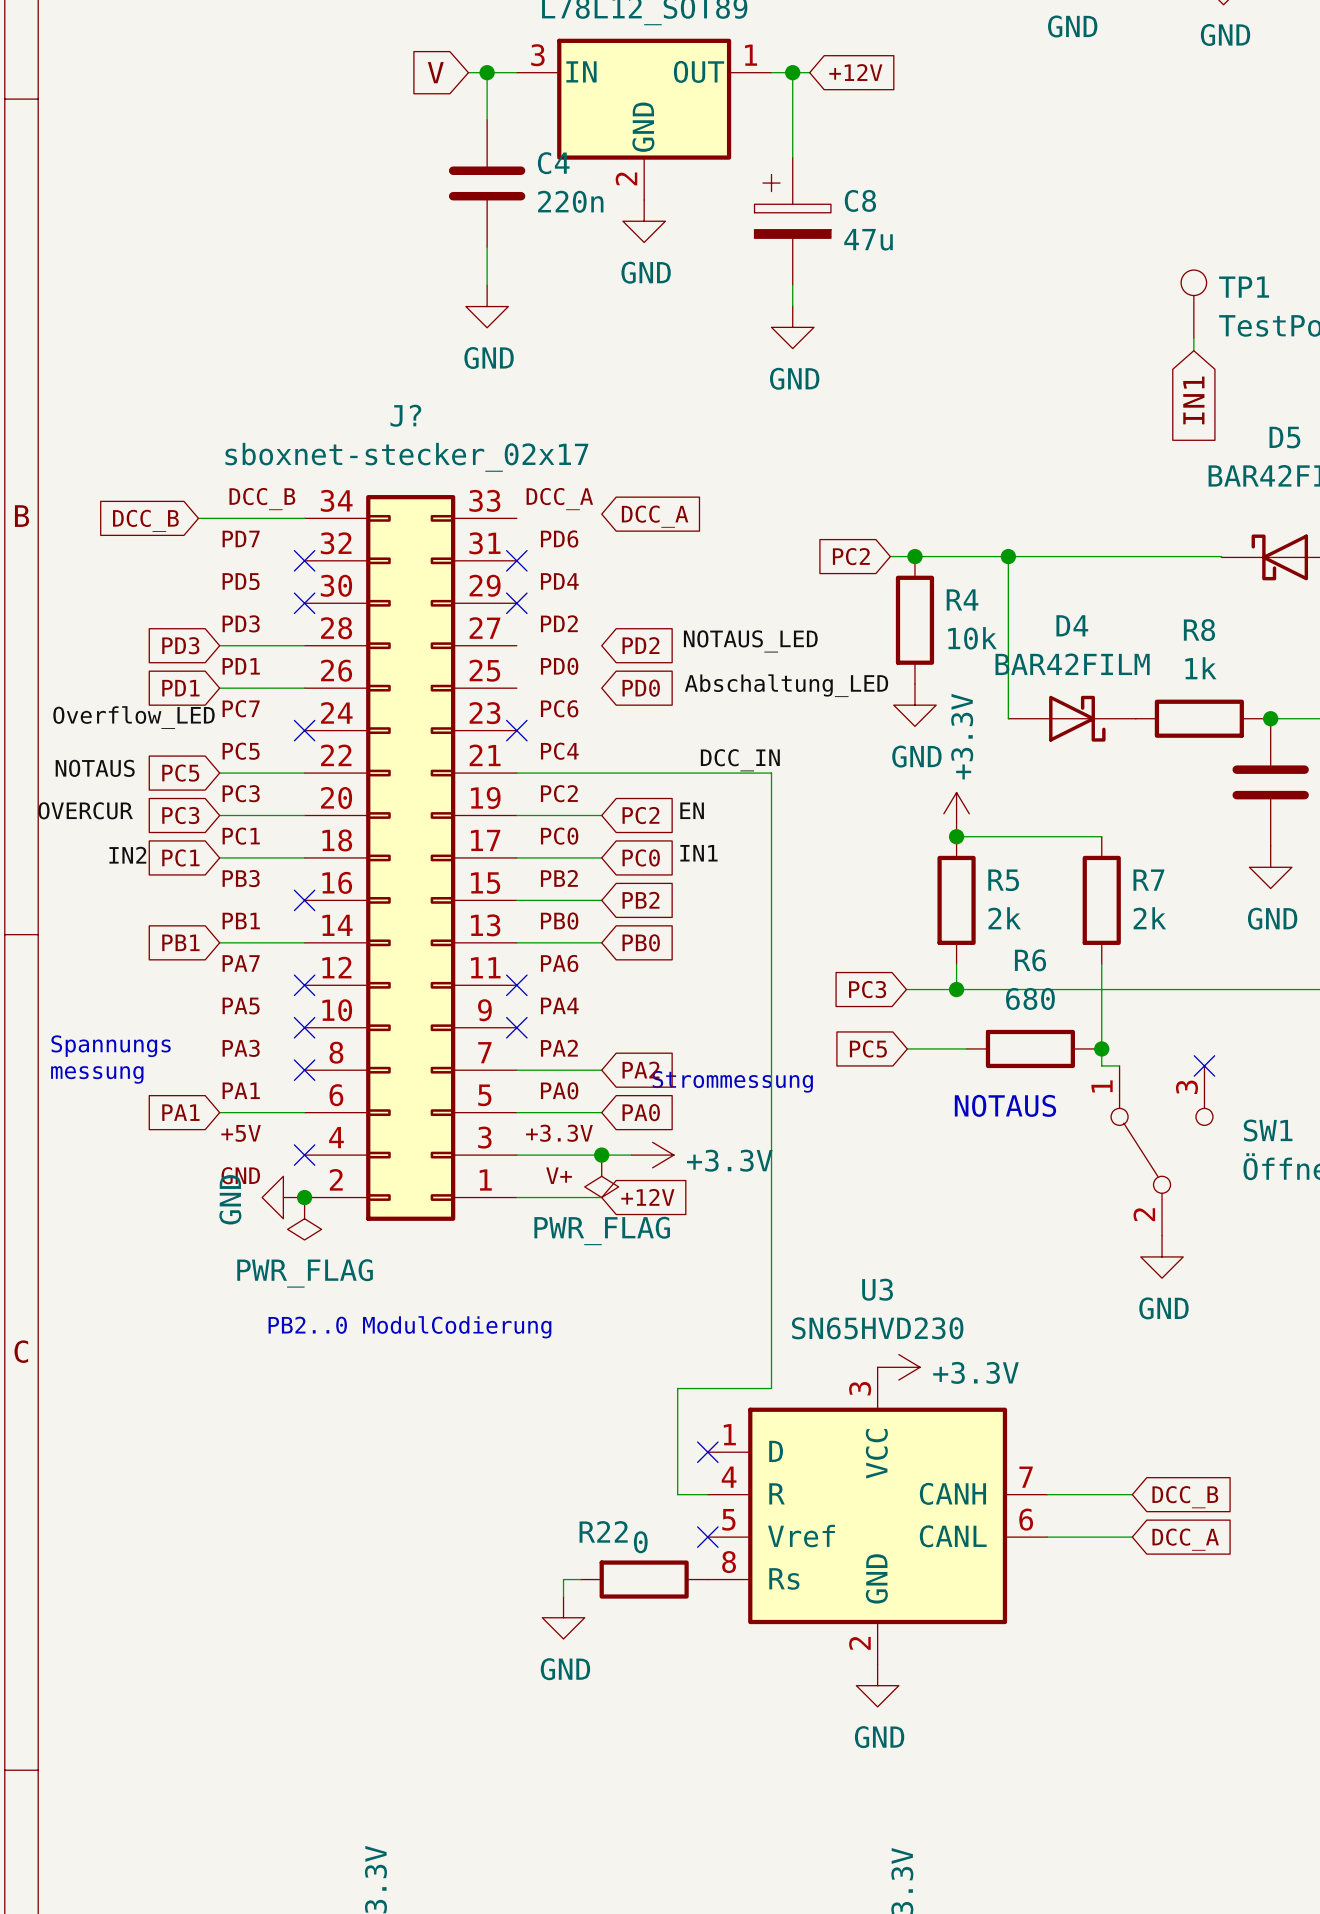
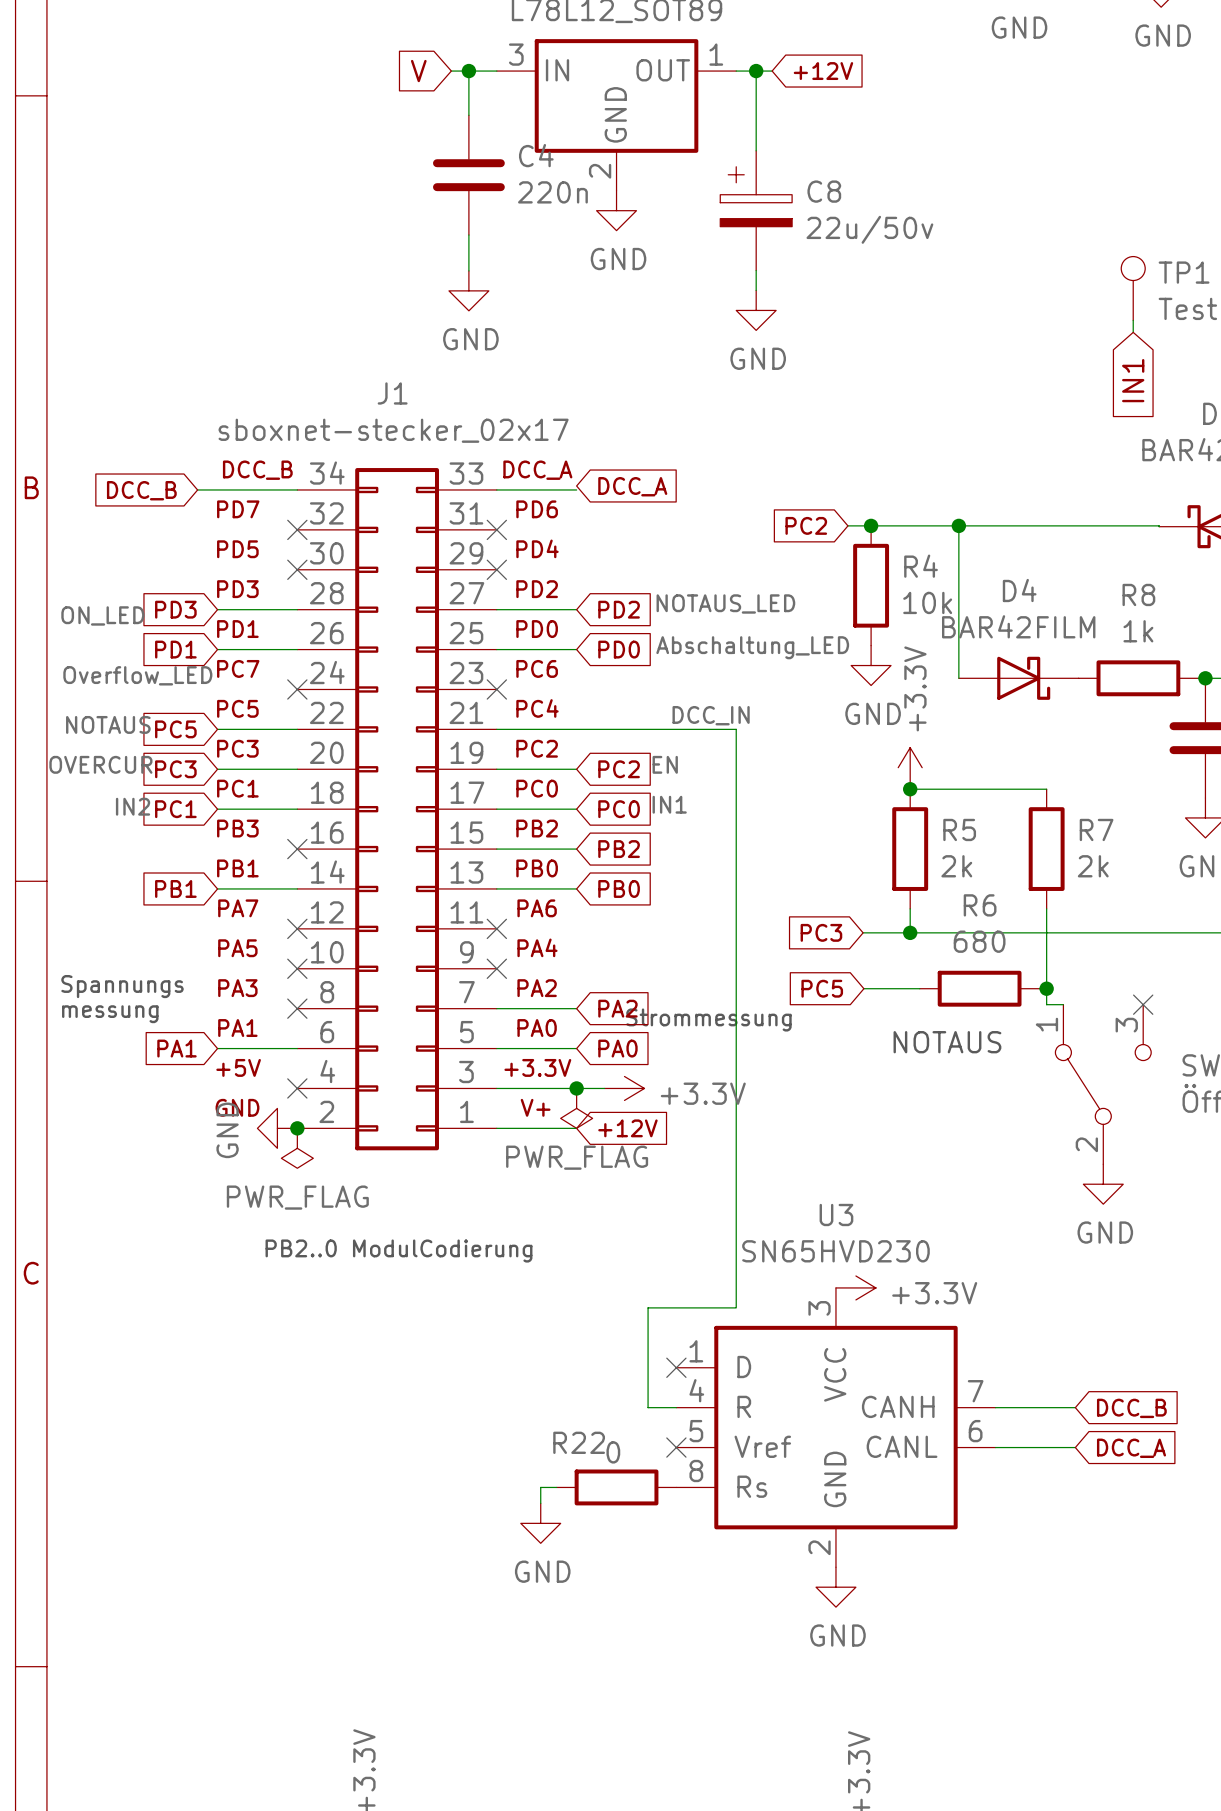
C8 value: 47u (868, 239) -> 22u/50v (869, 229)
J? name: J? (405, 415) -> J1 (392, 393)
wire: none -> (496, 489) (576, 489)
wire: none -> (496, 609) (576, 609)
label: none -> ON_LED (102, 615)
wire: none -> (496, 649) (576, 649)

